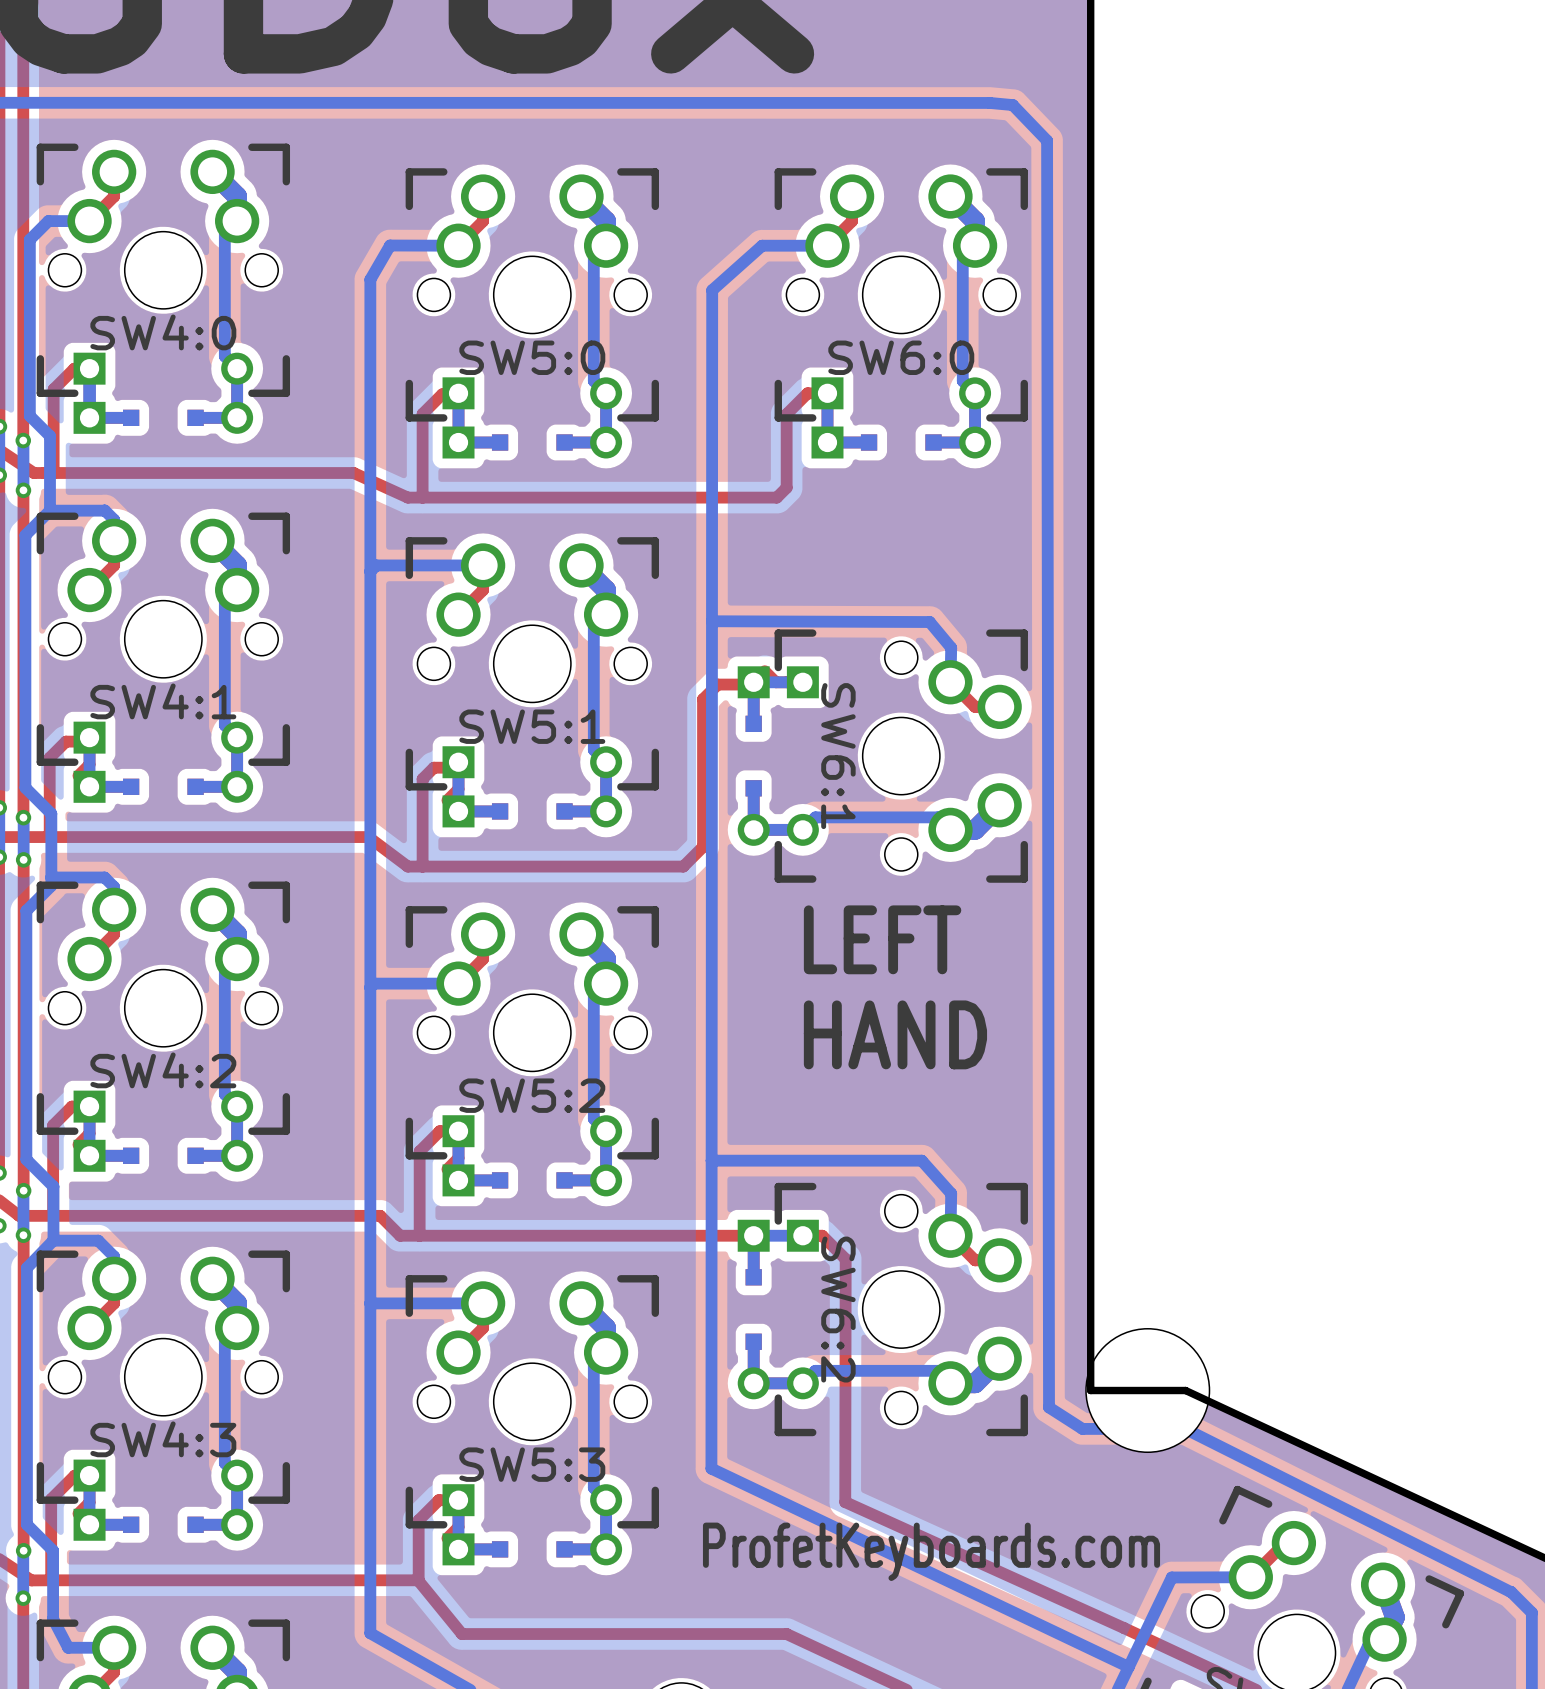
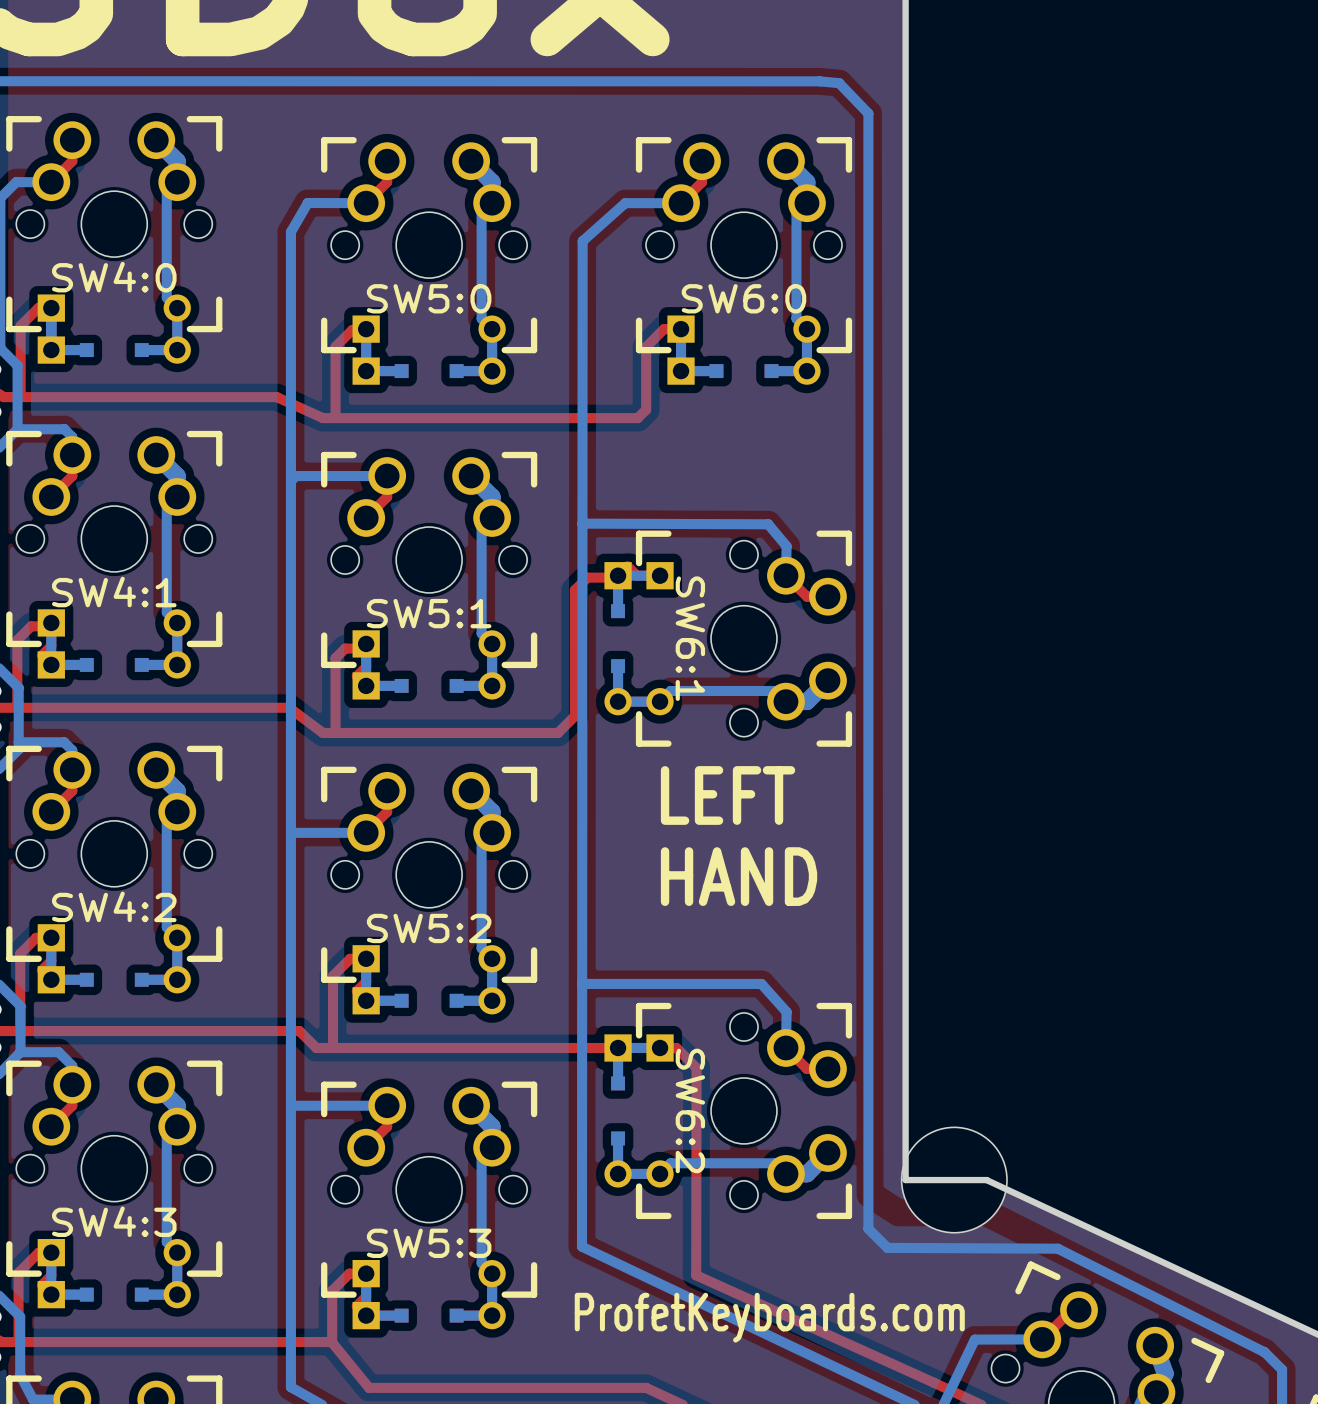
bottom track: (1047, 140) (1049, 1407) (1082, 1428) (1185, 1428) (1269, 1470) -> (868, 113) (868, 1228) (887, 1247) (1057, 1248)

